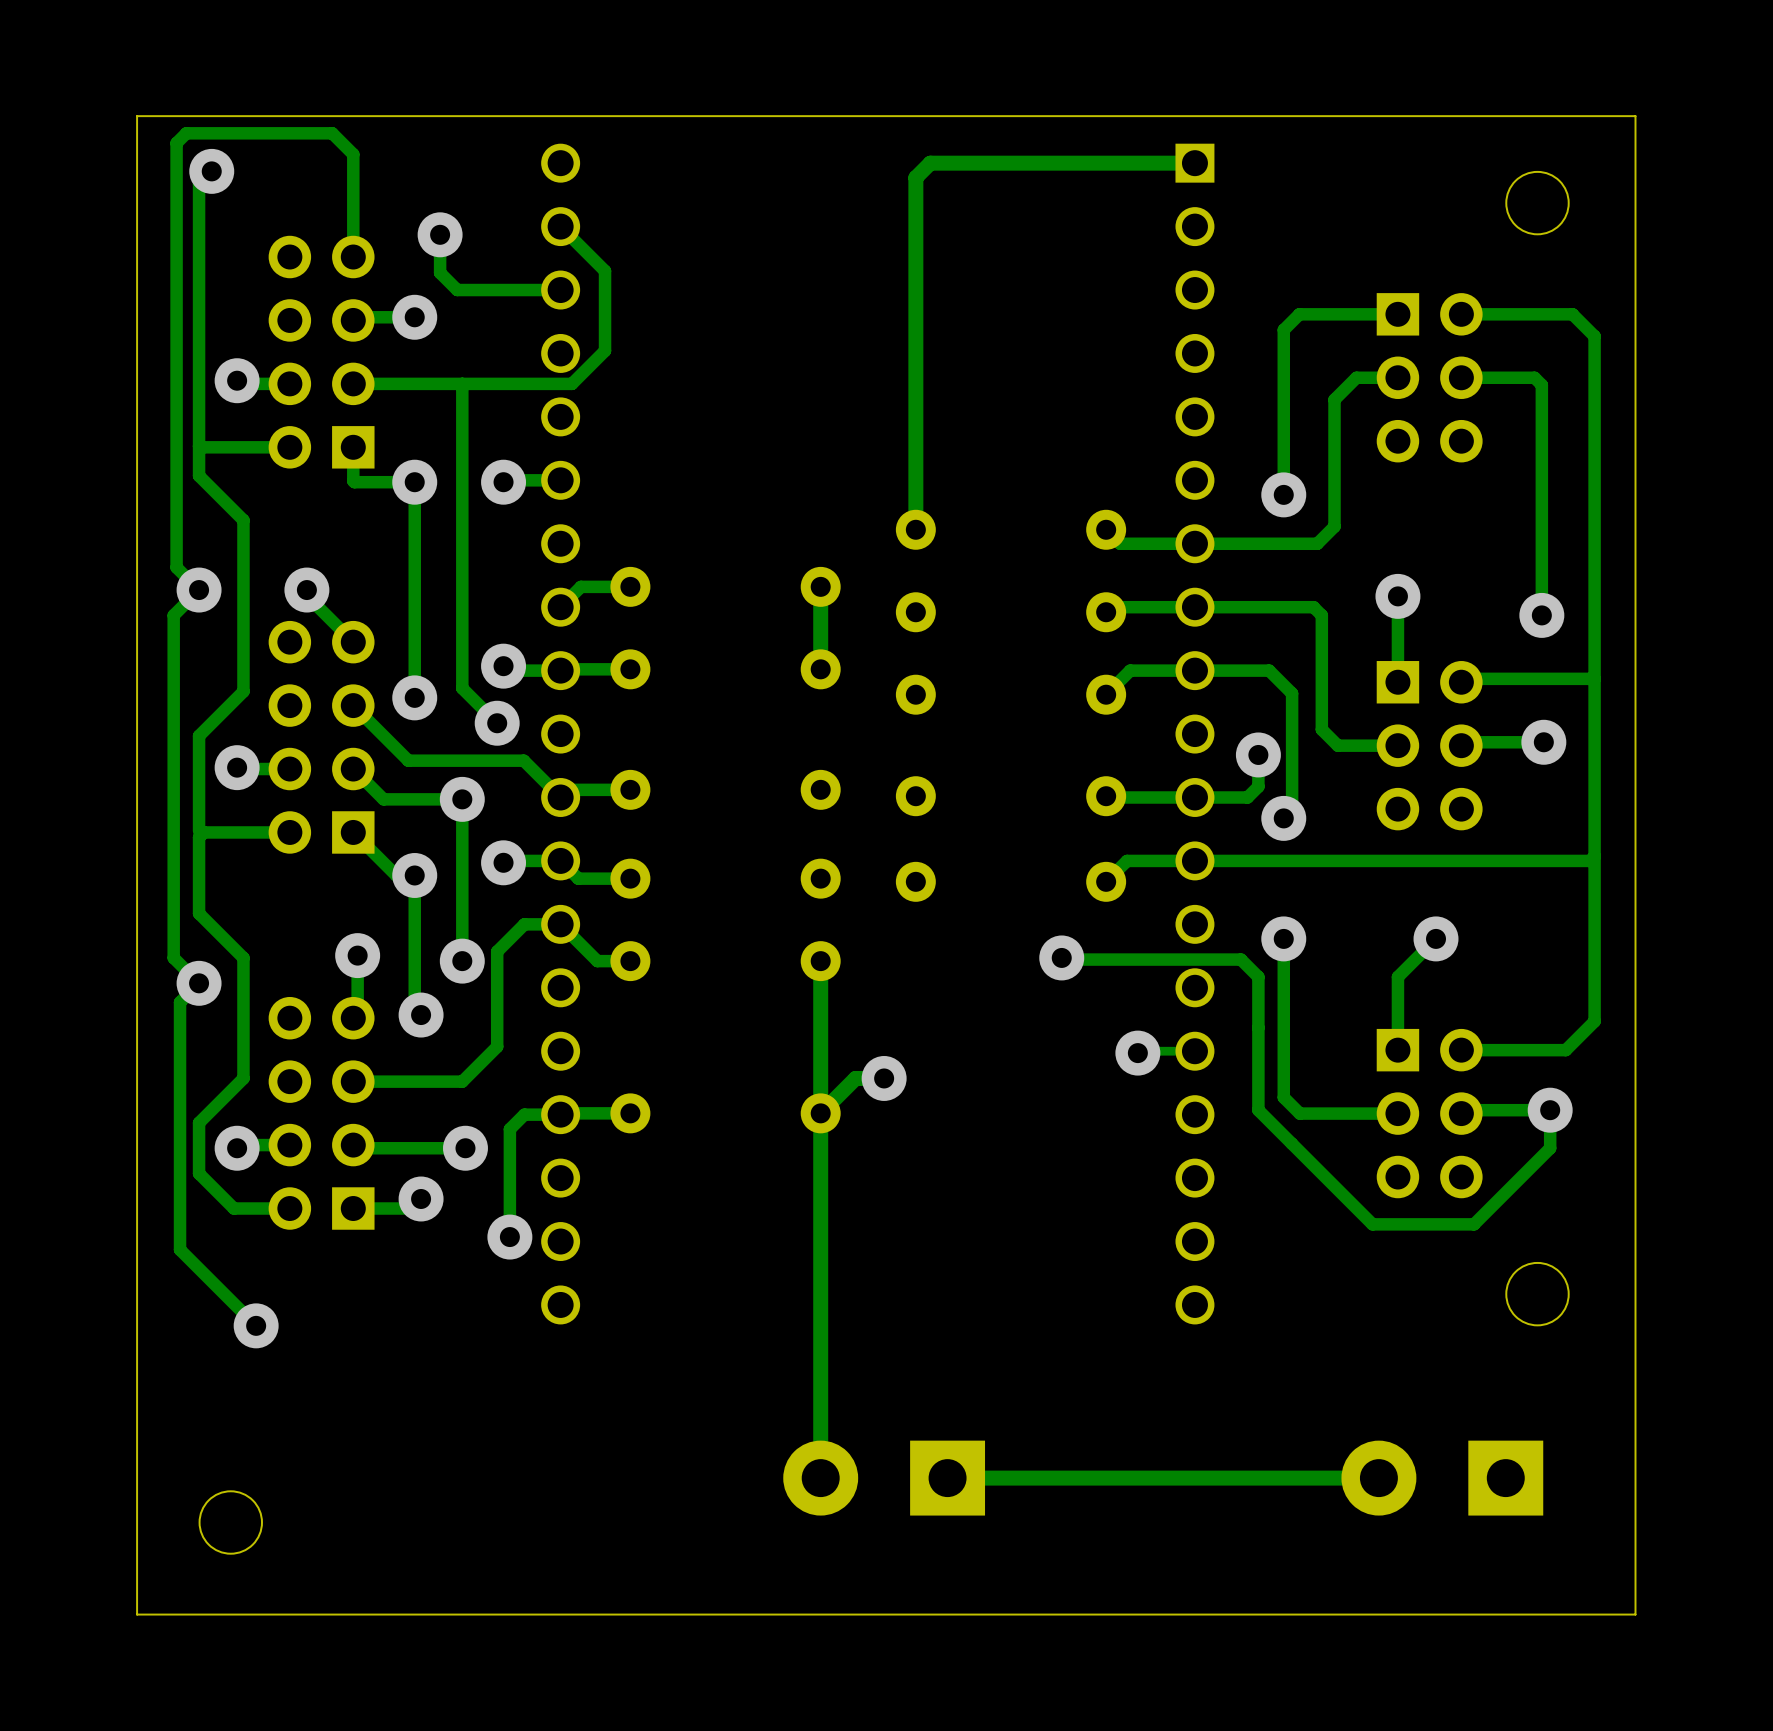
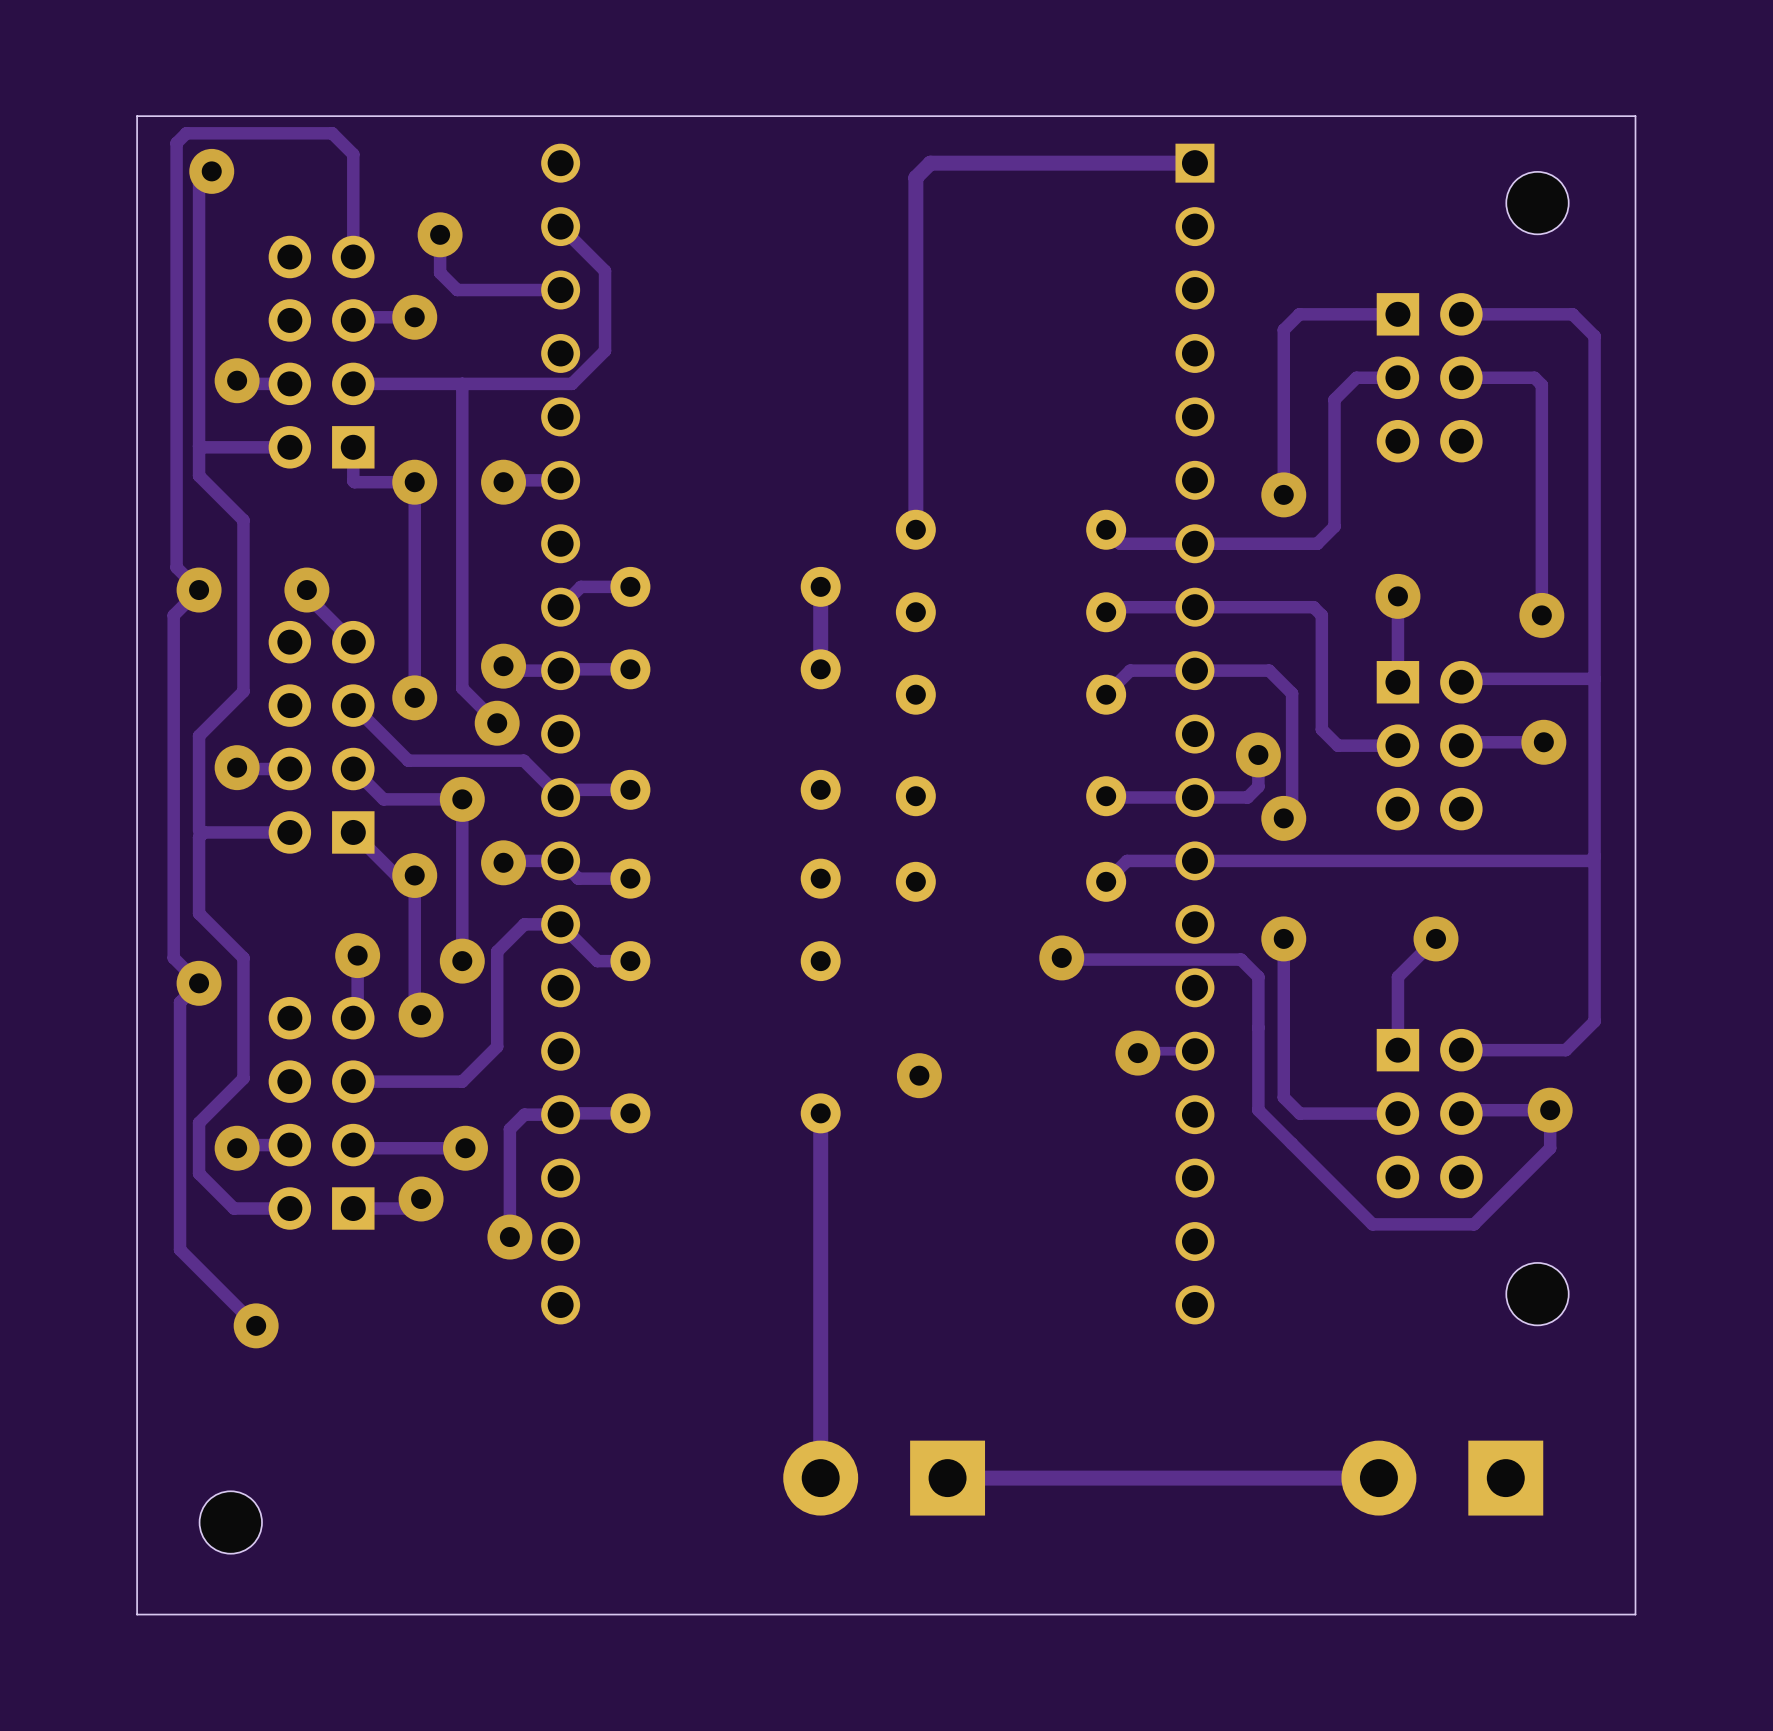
track: (820, 961) (820, 1113) (855, 1078) (884, 1078) -> none
via position: (884, 1078) -> (919, 1075)

